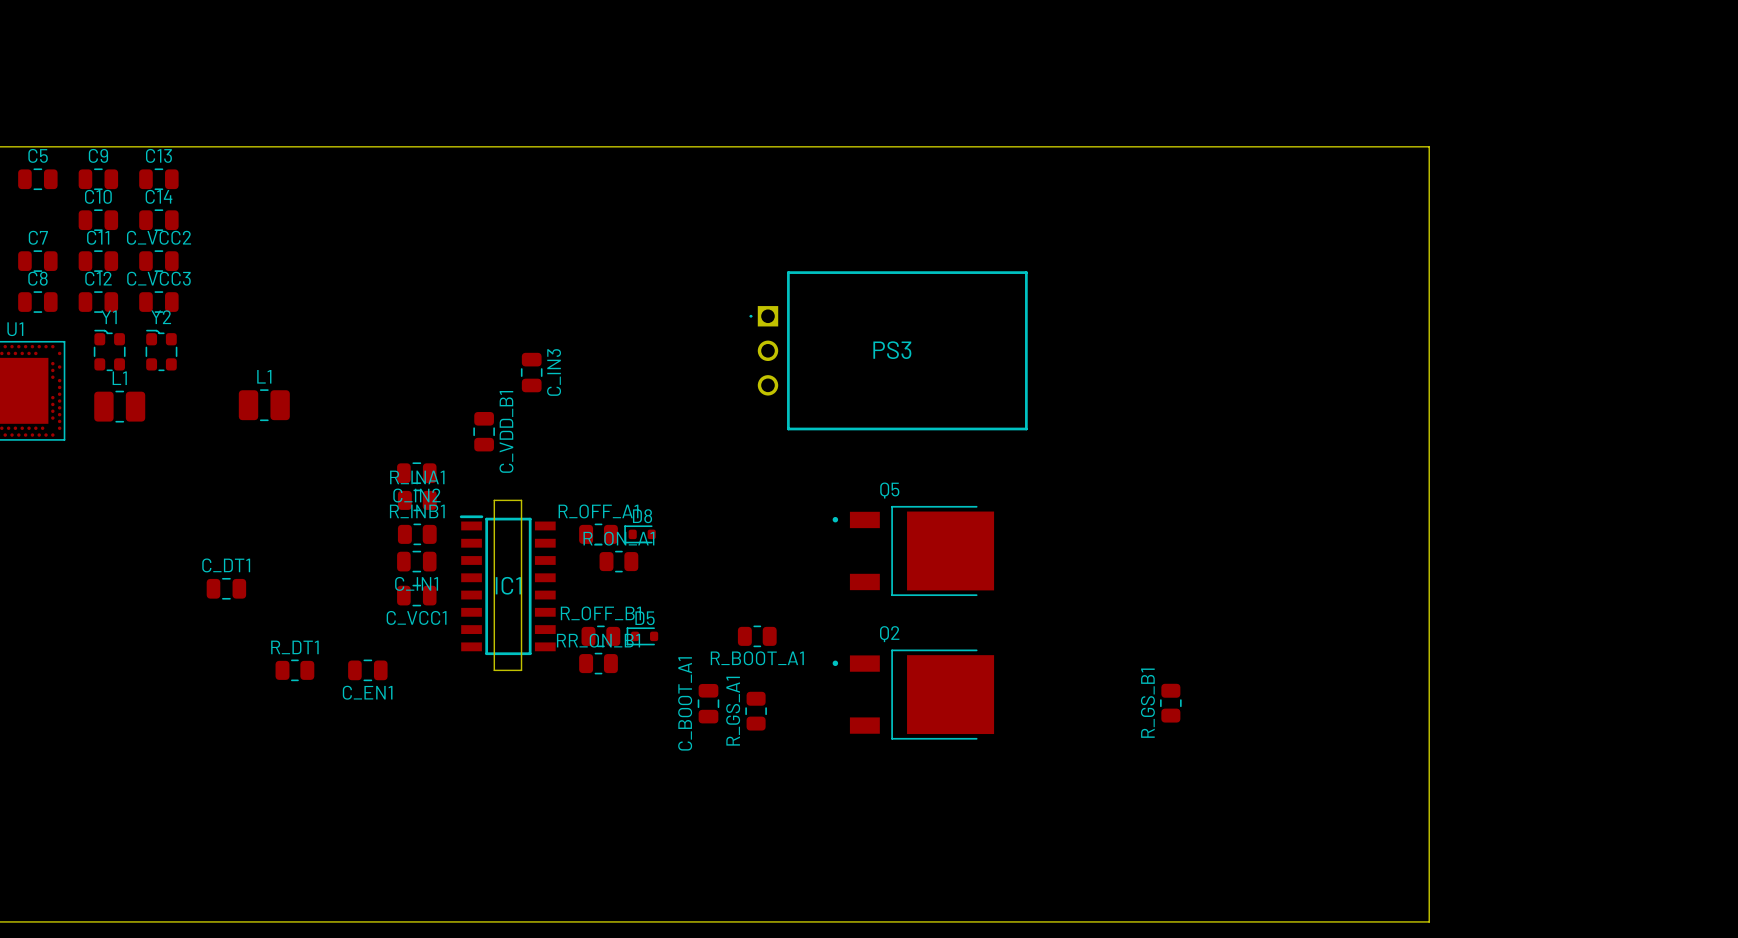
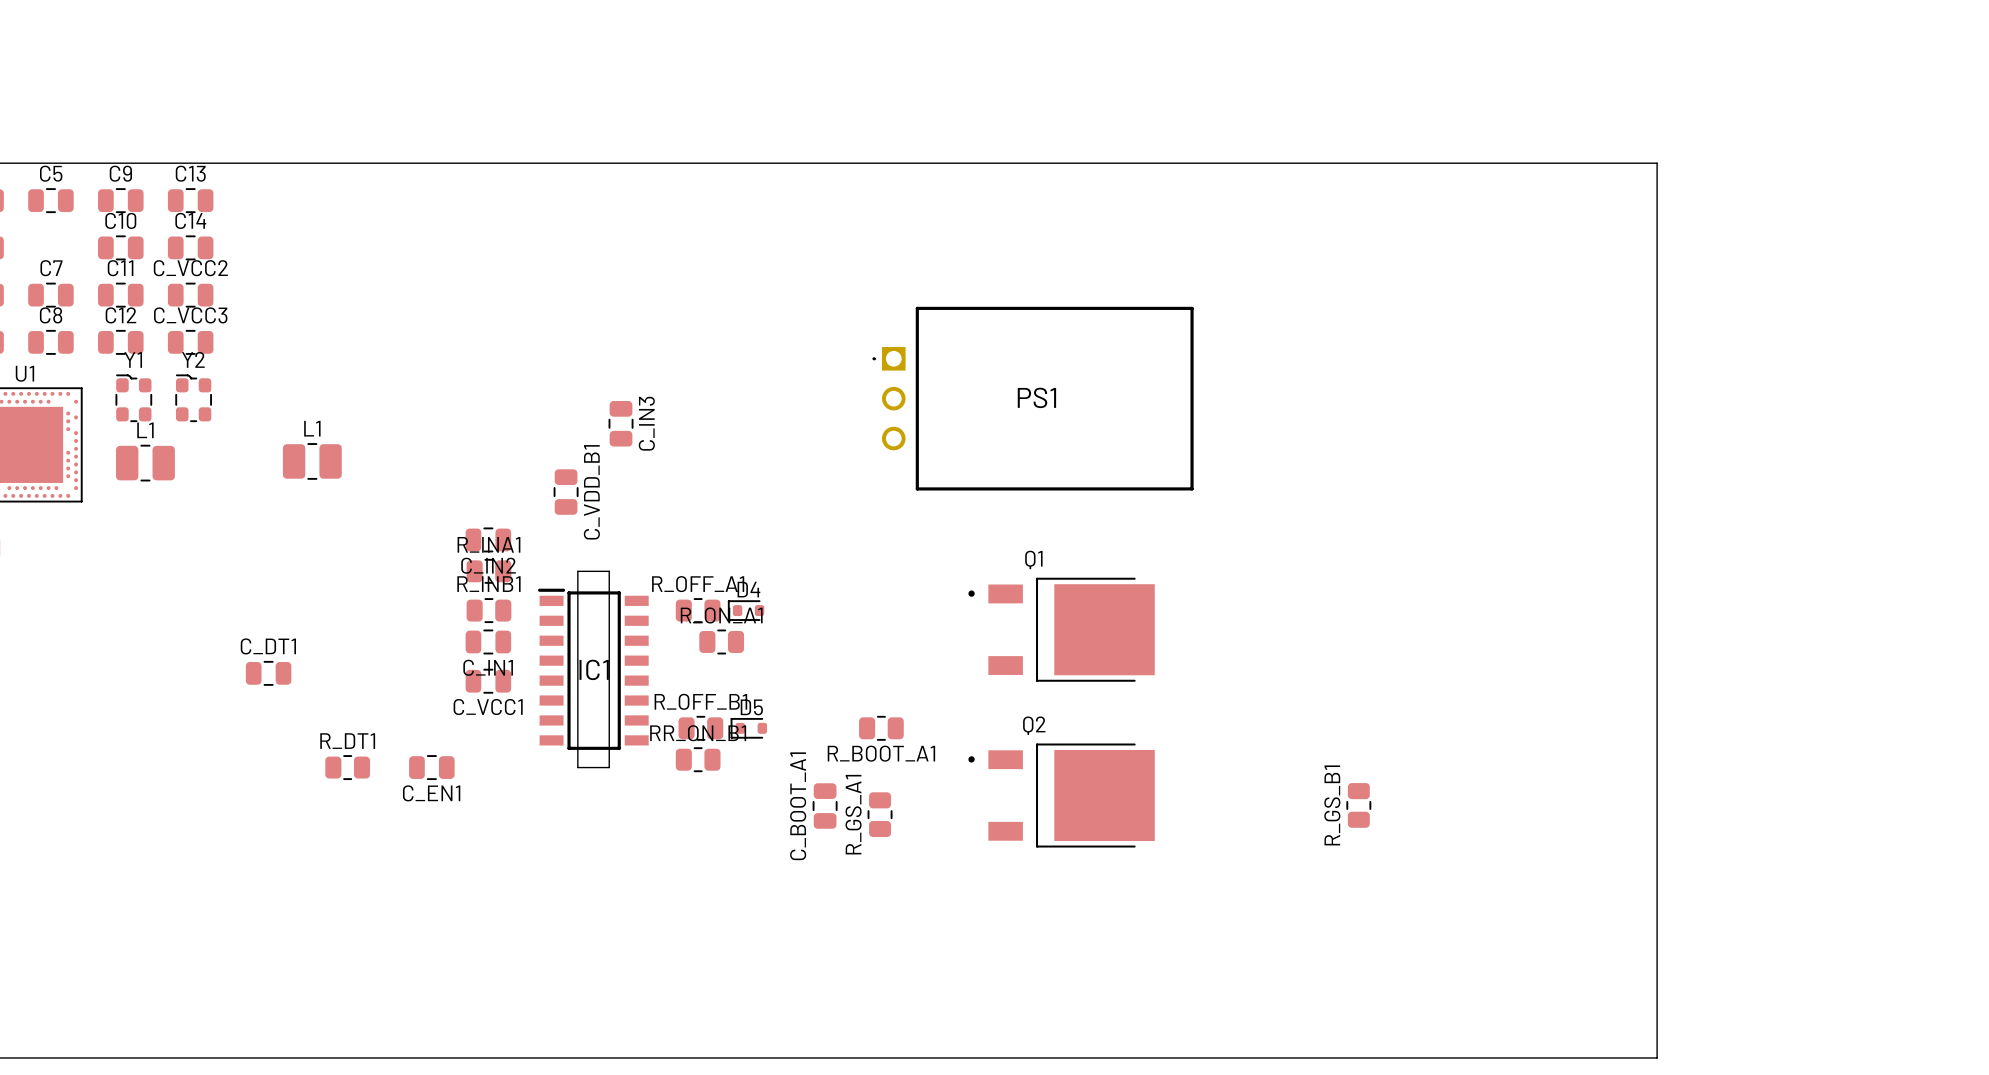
PS3 name: PS3 (892, 350) -> PS1 (1036, 397)
Q5 name: Q5 (889, 490) -> Q1 (1033, 559)
D8 name: D8 (642, 516) -> D4 (748, 589)

